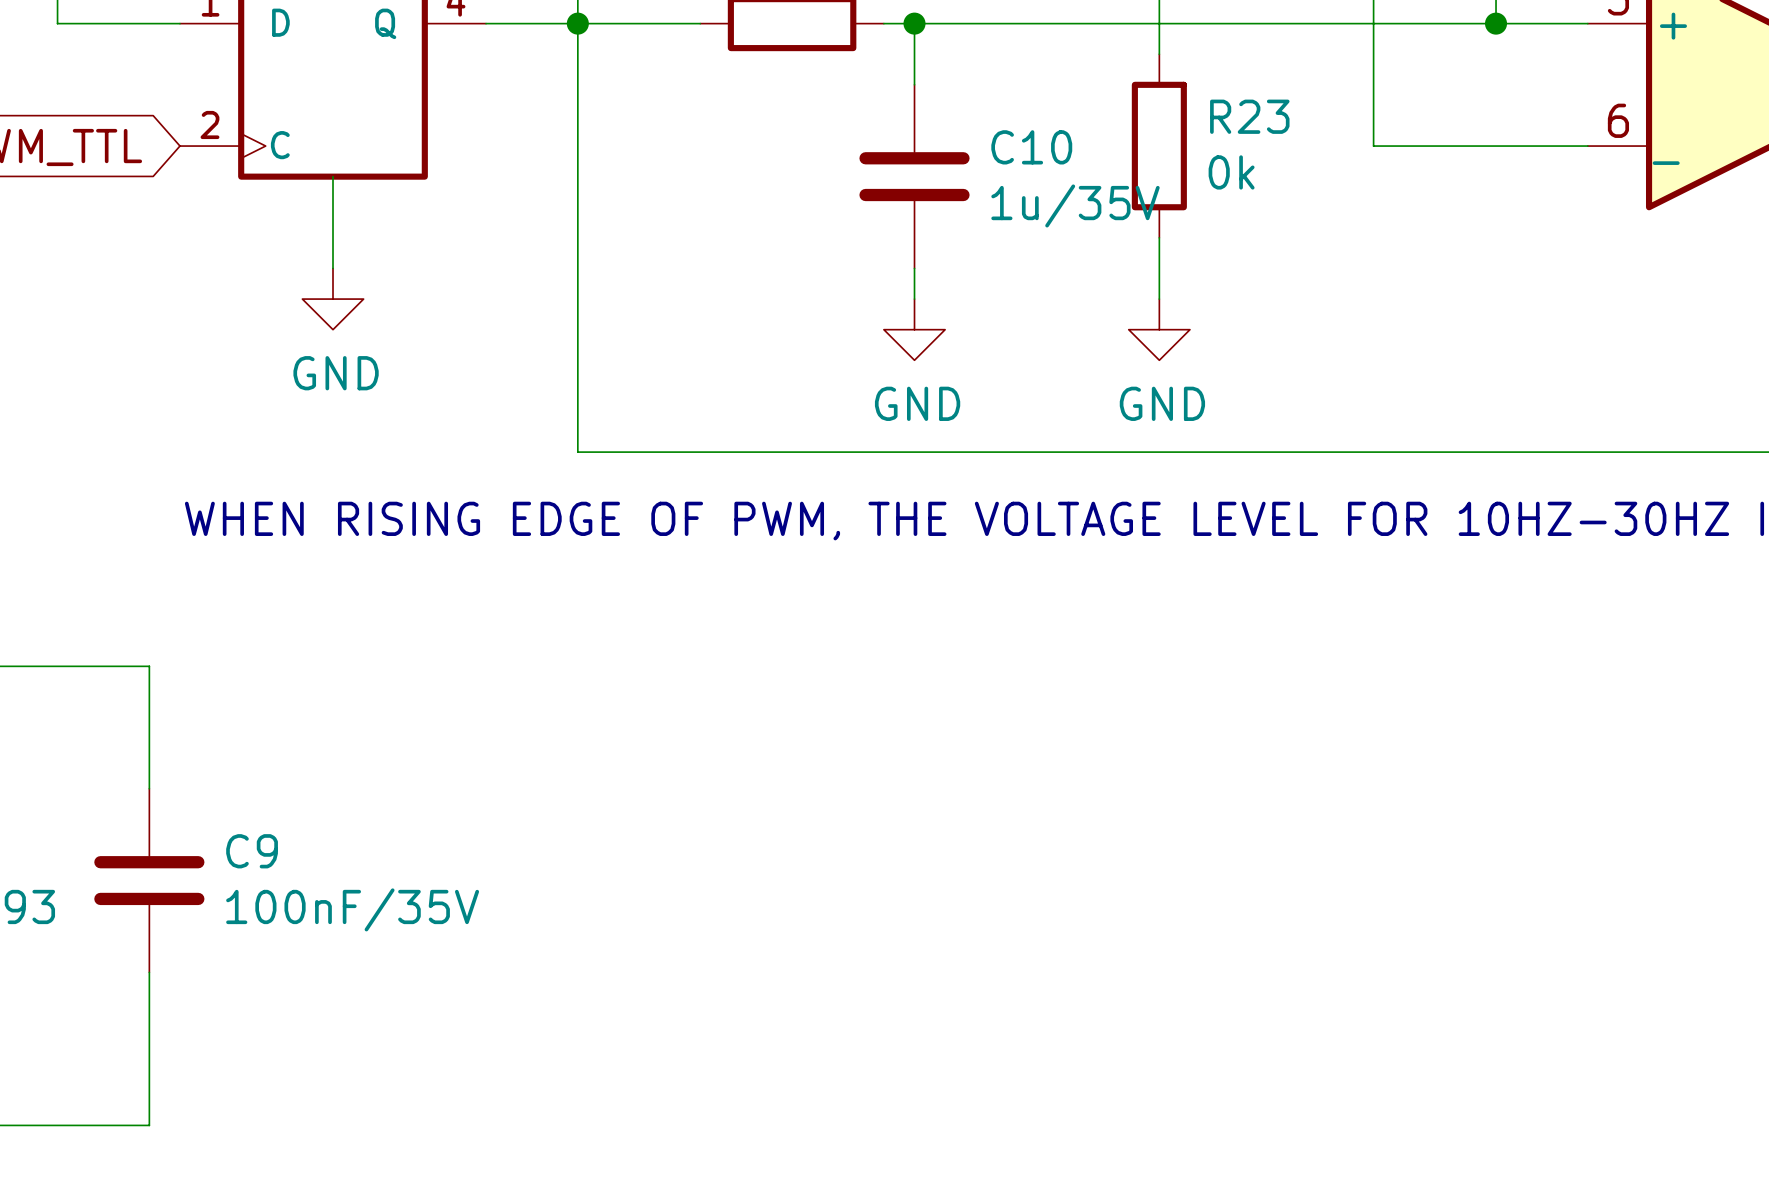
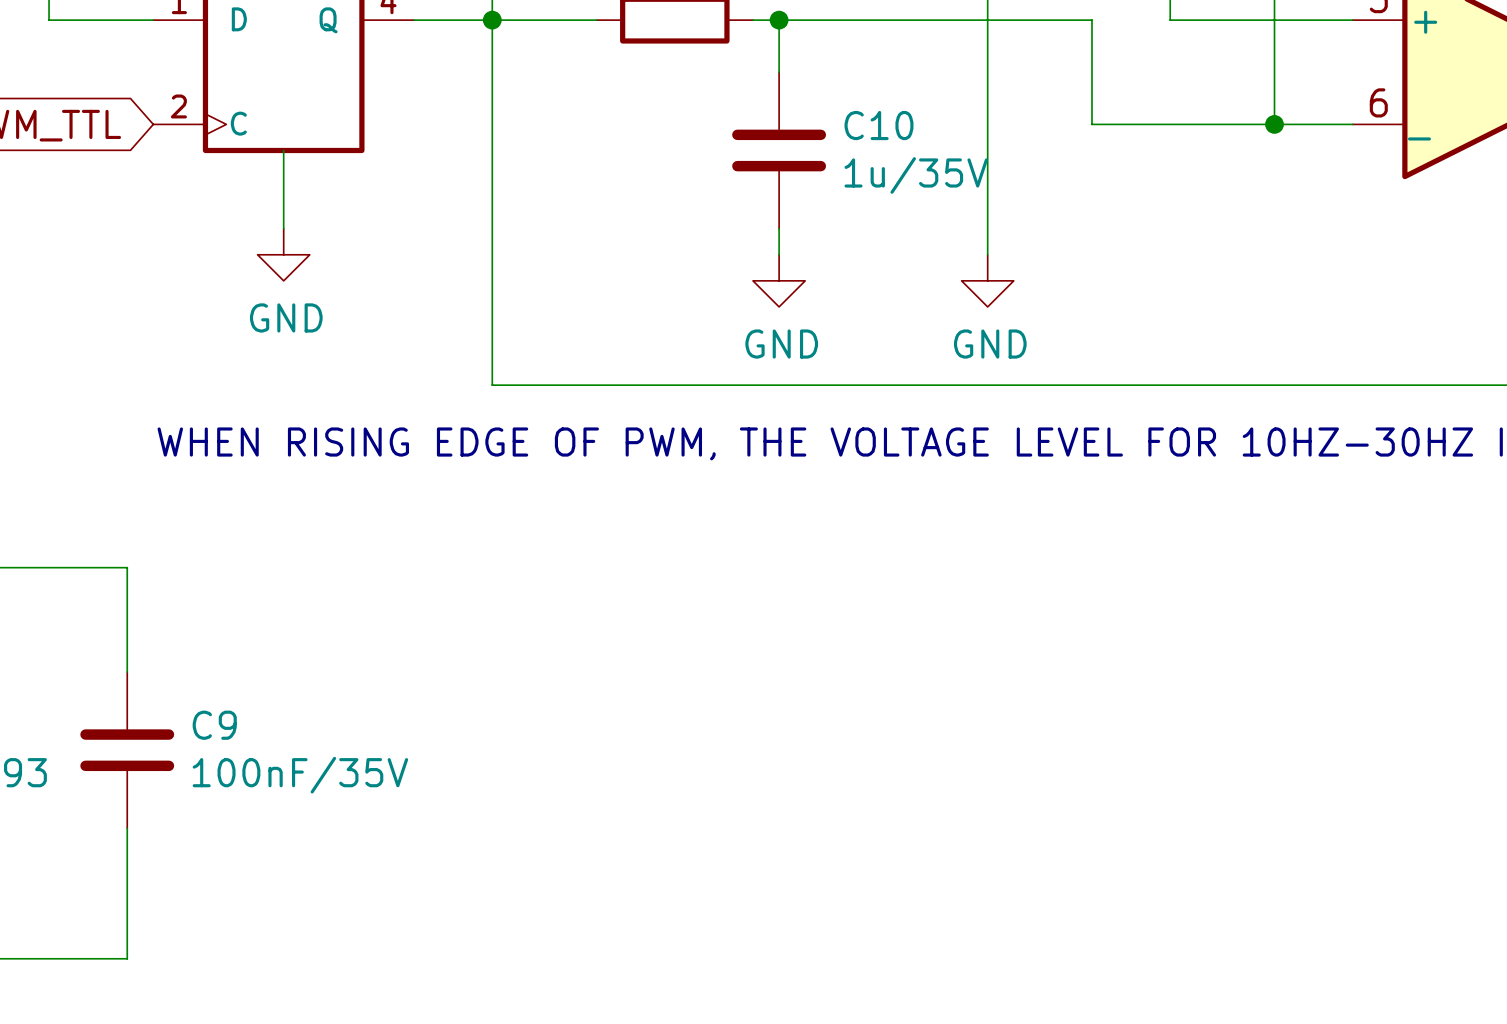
wire: (1281, 23) (1373, 23) (1373, 146) -> (1091, 20) (1091, 124) (1170, 124)
wire: none -> (1274, 20) (1274, 124)
junction position: (1496, 23) -> (1274, 124)
wire: none -> (987, 46) (987, 202)
R23: 0k (1159, 146) -> none

